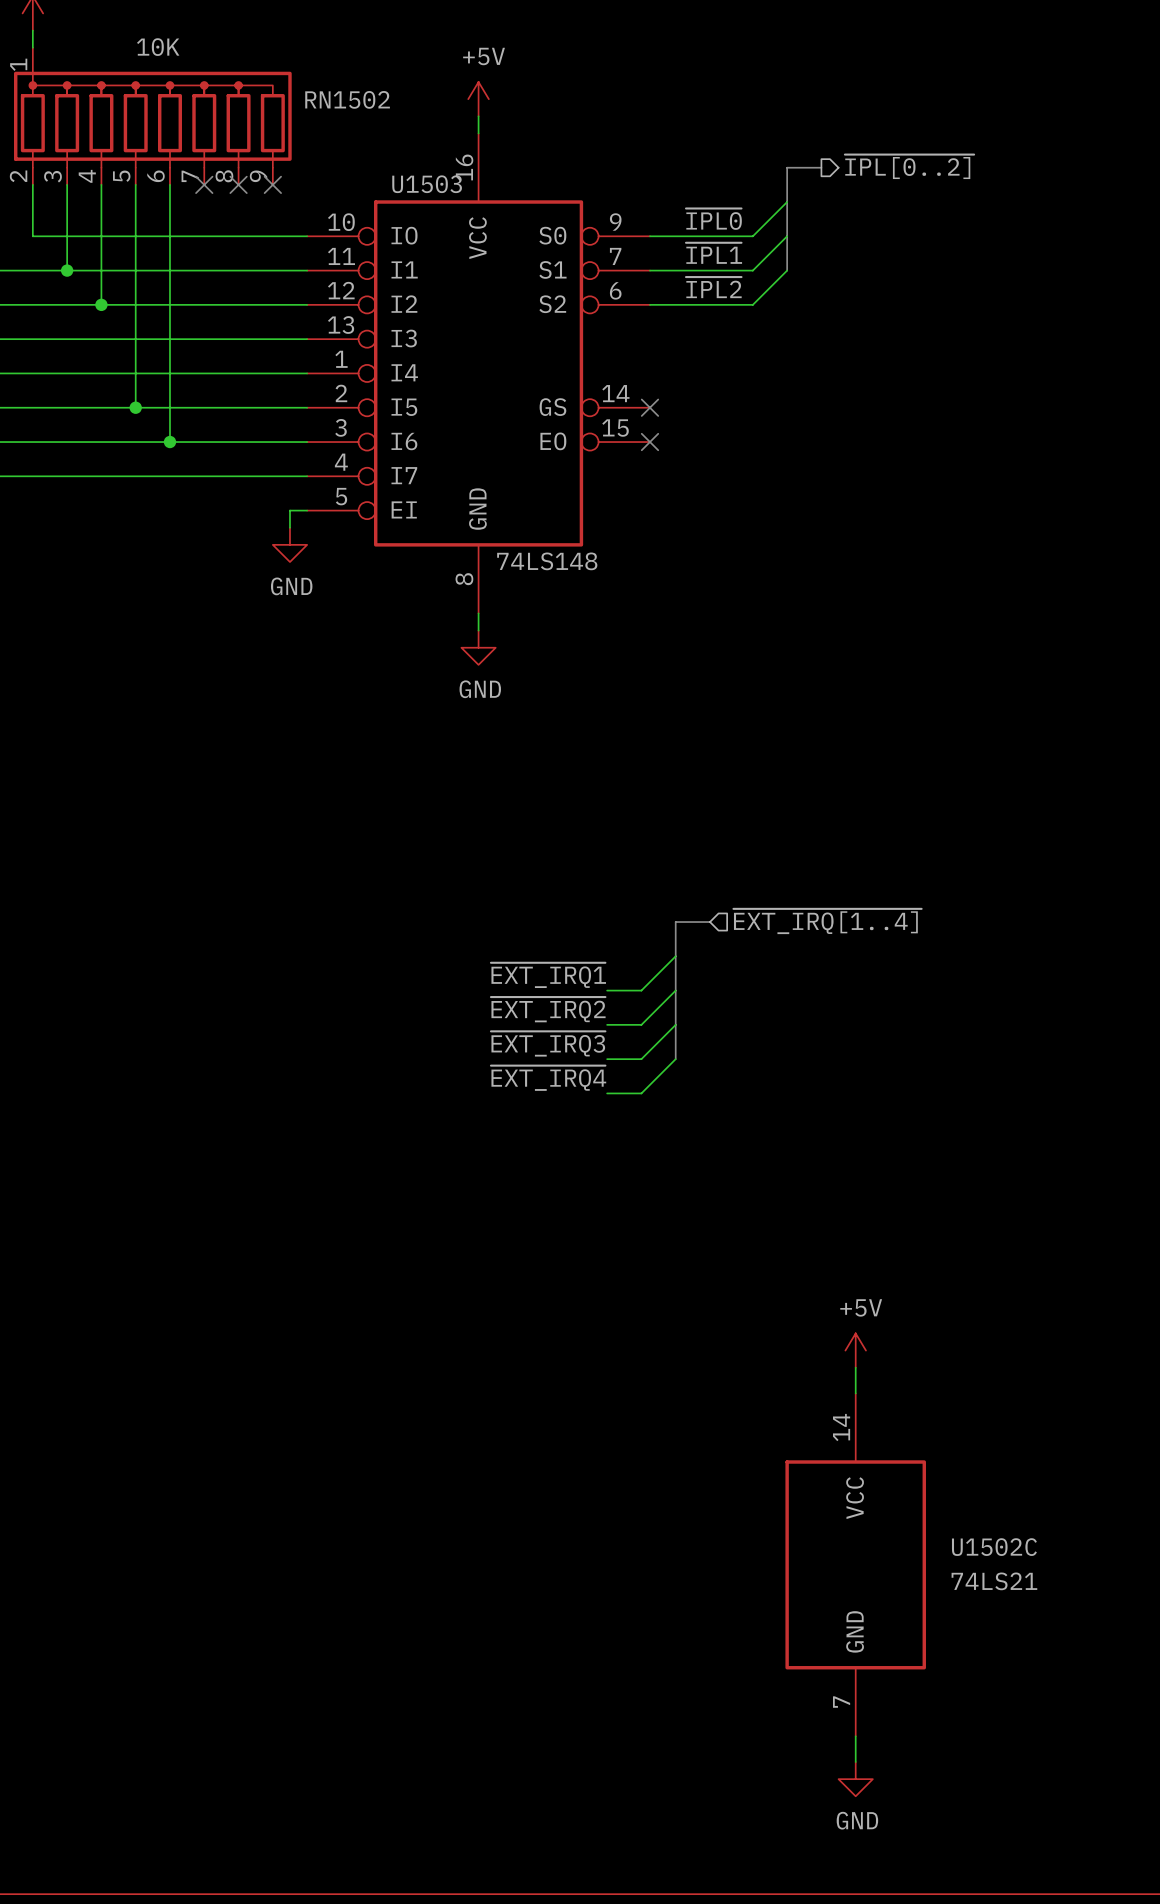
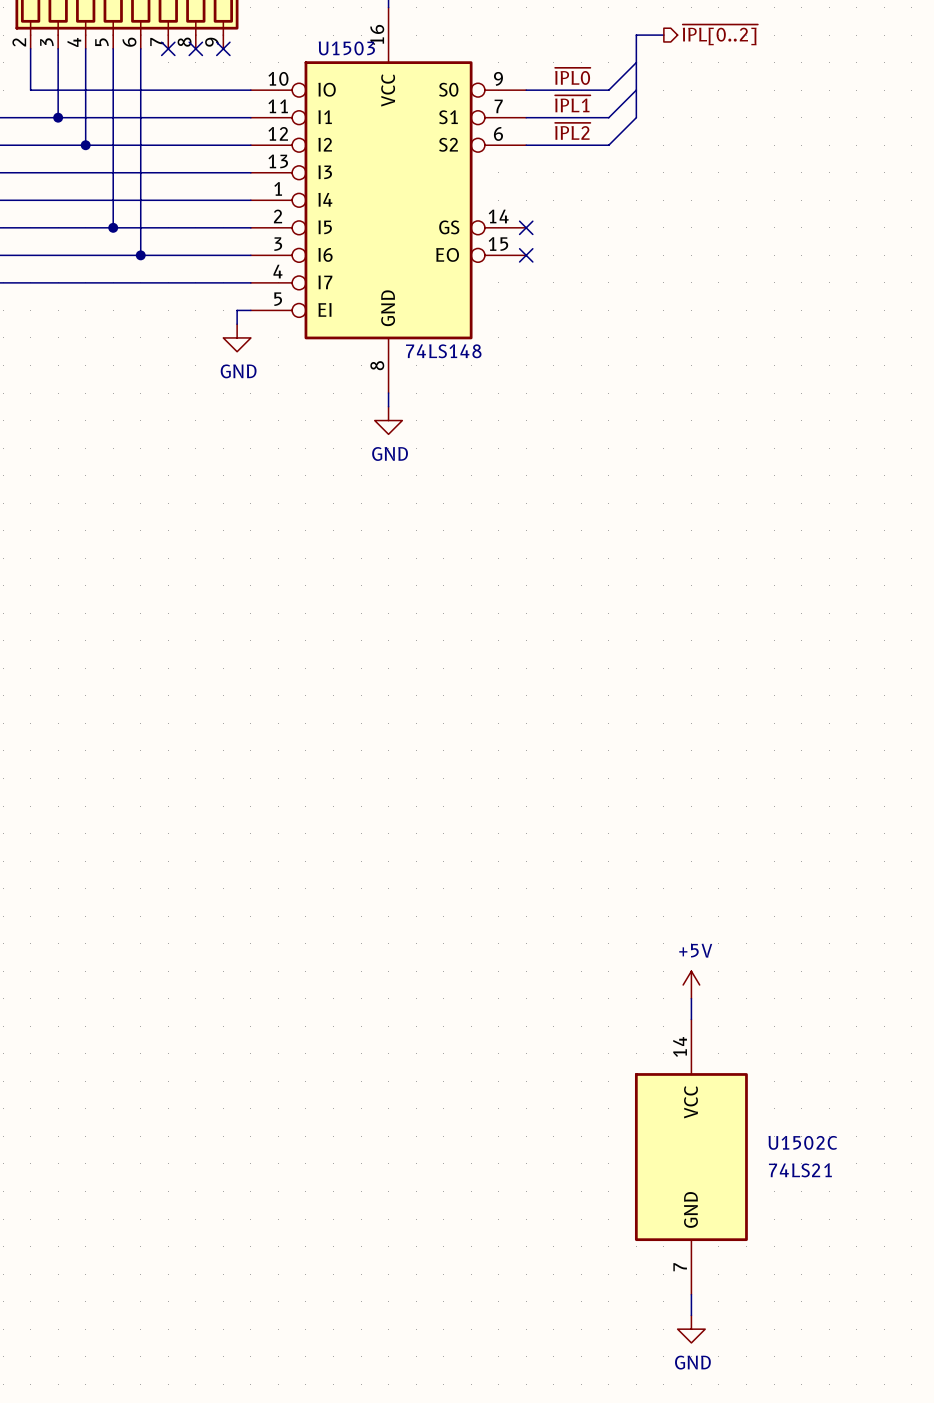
hierarchical label: ~{EXT_IRQ[1..4]} (827, 921) -> none
bus: (709, 922) (675, 922) (675, 1059) -> none
wire: (675, 956) (641, 990) (607, 990) -> none
label: ~{EXT_IRQ1} (548, 975) -> none
wire: (675, 990) (641, 1024) (607, 1024) -> none
label: ~{EXT_IRQ2} (548, 1009) -> none
wire: (675, 1024) (641, 1059) (607, 1059) -> none
label: ~{EXT_IRQ3} (548, 1043) -> none
wire: (675, 1059) (641, 1093) (607, 1093) -> none
label: ~{EXT_IRQ4} (548, 1078) -> none

